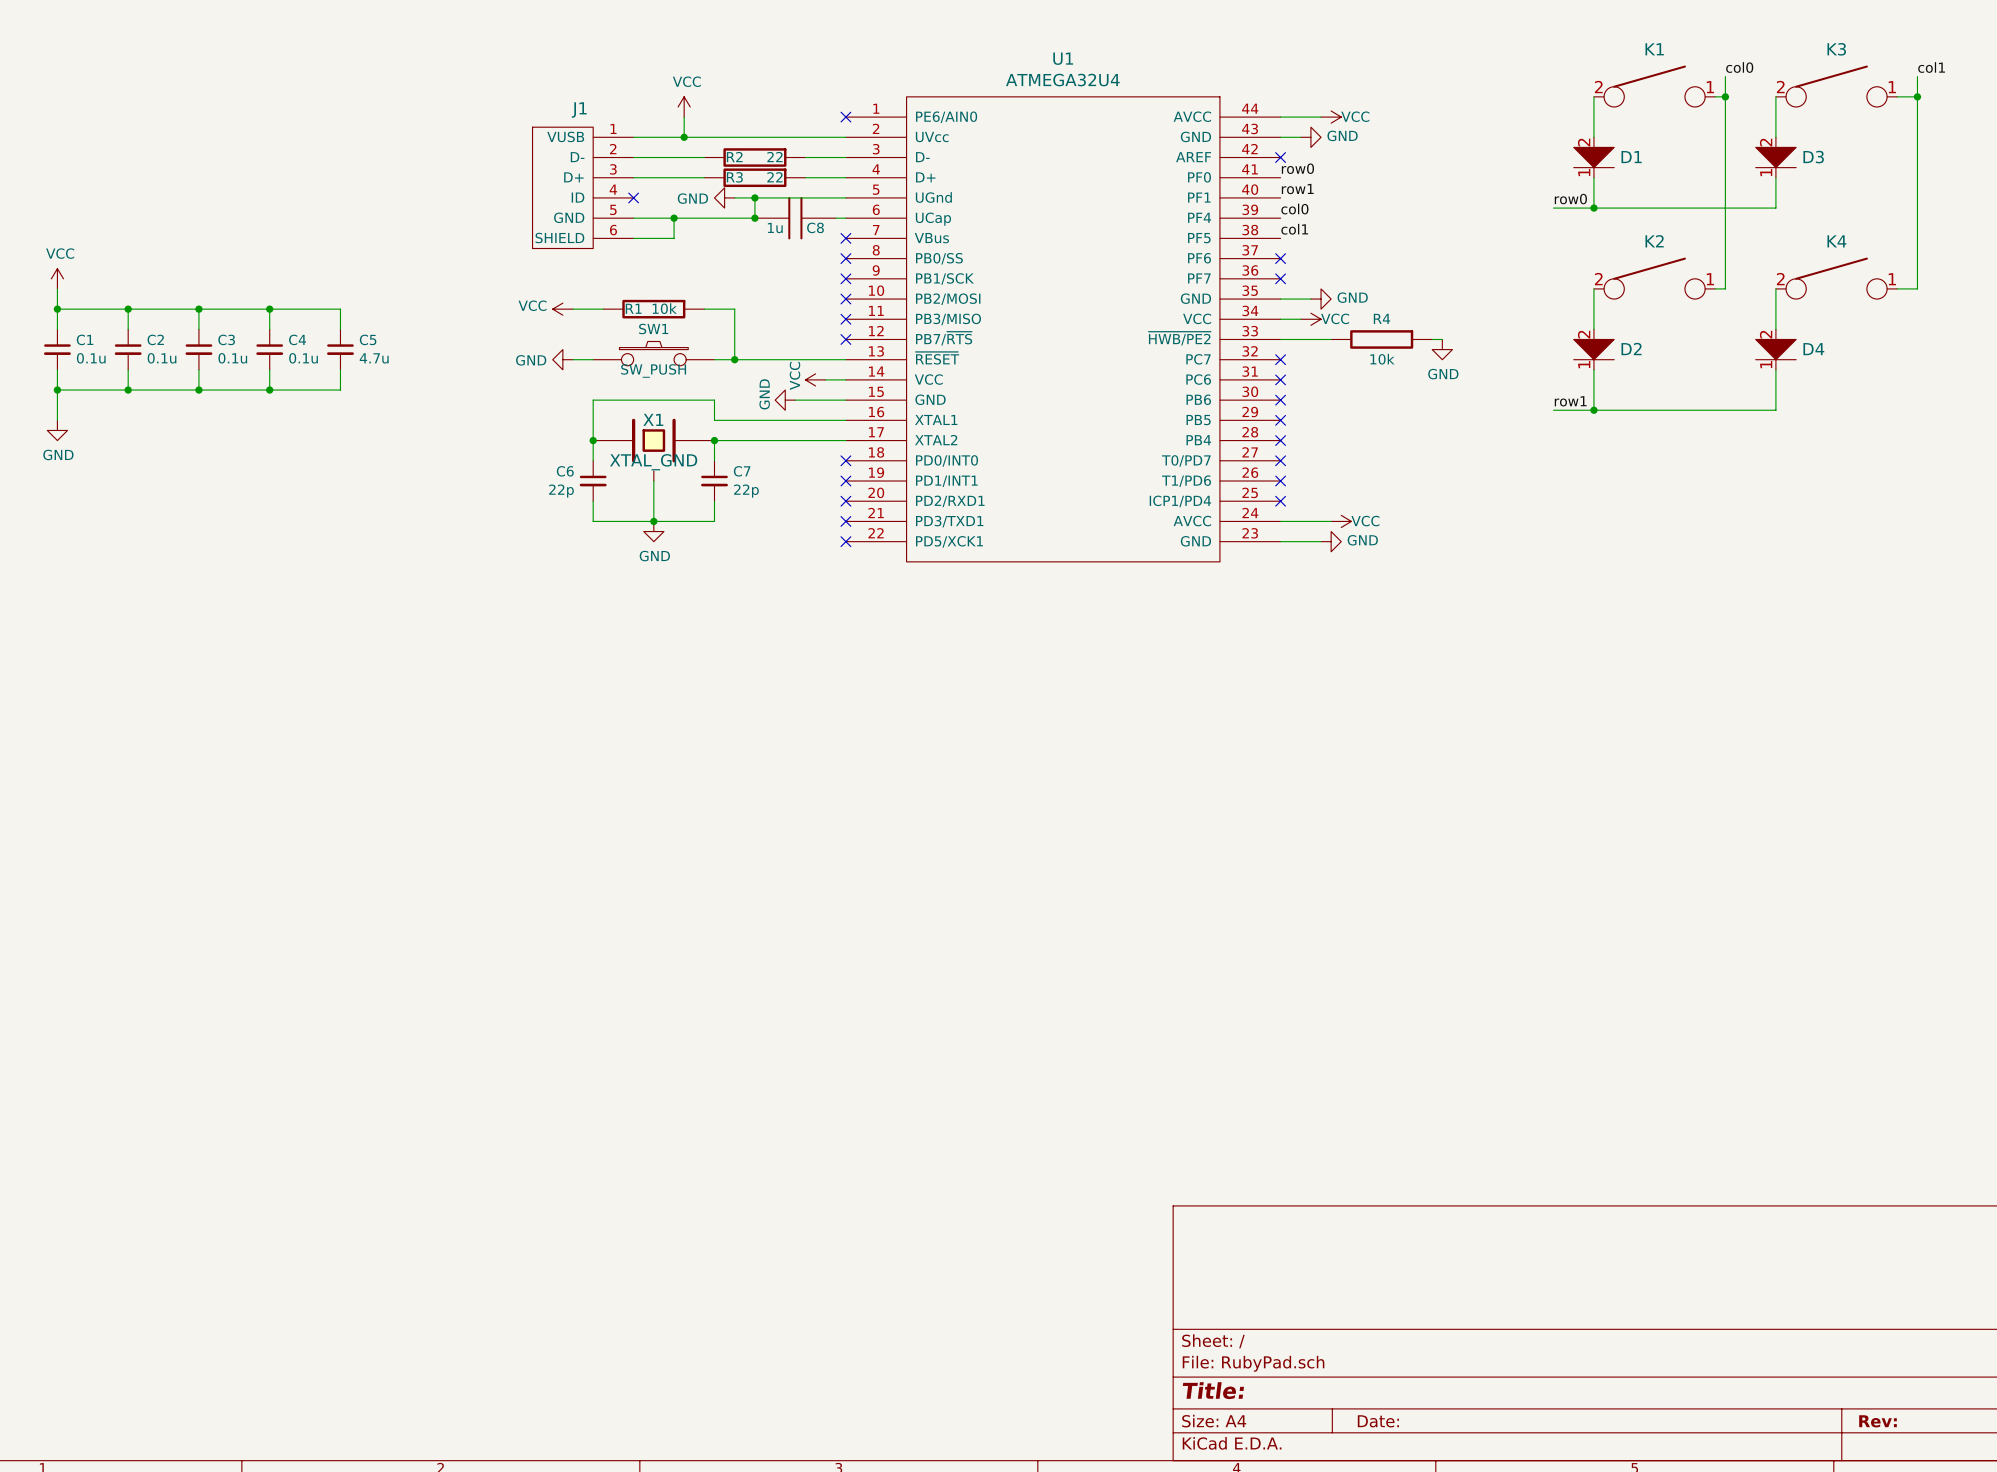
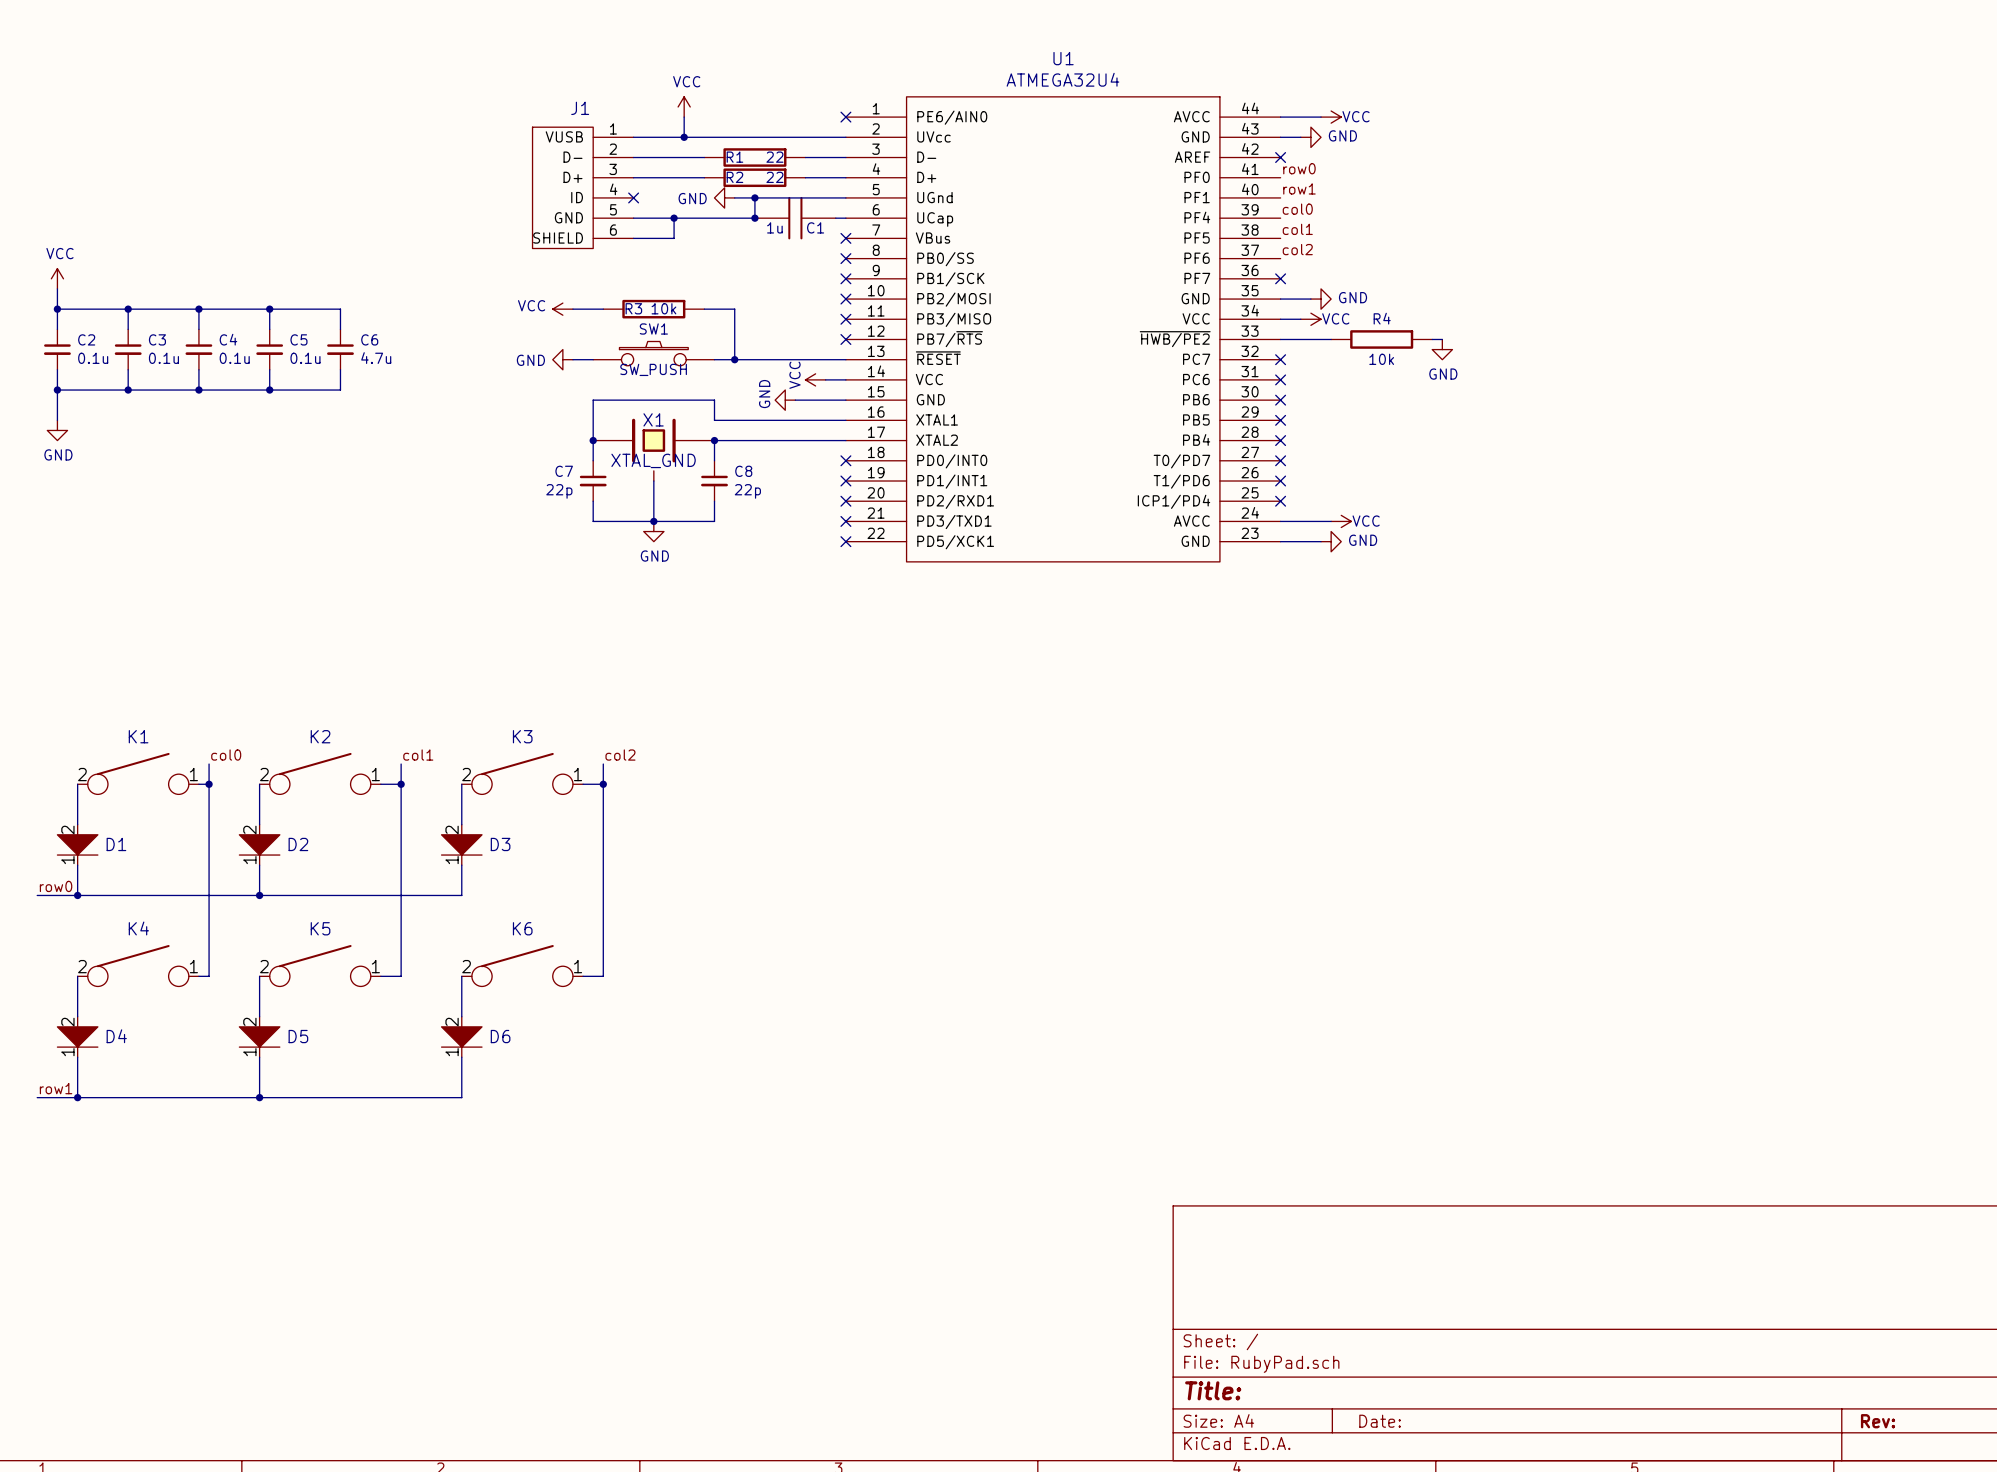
label: col0 (1739, 67) -> none
label: col1 (1931, 67) -> none
wire: (1725, 76) (1725, 288) (1715, 288) -> none
wire: (1917, 76) (1917, 288) (1897, 288) -> none
K1 position: (1654, 86) -> (138, 773)
K3 position: (1836, 86) -> (522, 773)
wire: (1593, 96) (1593, 137) -> none
wire: (1715, 96) (1725, 96) -> none
junction: (1725, 96) -> none
wire: (1775, 96) (1775, 137) -> none
wire: (1897, 96) (1917, 96) -> none
junction: (1917, 96) -> none
R2 name: R2 (734, 157) -> R1 (734, 157)
D1 position: (1593, 157) -> (77, 844)
D3 position: (1775, 157) -> (461, 844)
R3 name: R3 (734, 177) -> R2 (734, 177)
wire: (1593, 177) (1593, 208) -> none
wire: (1775, 177) (1775, 208) (1553, 208) -> none
label: row0 (1570, 199) -> none
junction: (1593, 208) -> none
C8 name: C8 (815, 227) -> C1 (815, 227)
label: none -> col2 (1297, 249)
no-connect mark: (1280, 258) -> none
K2 position: (1654, 278) -> (320, 773)
K4 position: (1836, 278) -> (138, 965)
wire: (1593, 288) (1593, 329) -> none
wire: (1775, 288) (1775, 329) -> none
R1 name: R1 (633, 308) -> R3 (633, 308)
C1 name: C1 (85, 339) -> C2 (86, 339)
C2 name: C2 (155, 339) -> C3 (157, 339)
C3 name: C3 (226, 339) -> C4 (228, 339)
C4 name: C4 (297, 339) -> C5 (298, 339)
C5 name: C5 (368, 339) -> C6 (369, 339)
D2 position: (1593, 349) -> (259, 844)
D4 position: (1775, 349) -> (77, 1036)
wire: (1593, 369) (1593, 410) -> none
wire: (1775, 369) (1775, 410) (1553, 410) -> none
label: row1 (1570, 401) -> none
junction: (1593, 410) -> none
C6 name: C6 (565, 471) -> C7 (564, 471)
C7 name: C7 (742, 471) -> C8 (743, 471)
label: none -> col0 (226, 755)
label: none -> col1 (418, 755)
label: none -> col2 (620, 755)
wire: none -> (209, 764) (209, 976) (198, 976)
wire: none -> (401, 764) (401, 976) (380, 976)
wire: none -> (603, 764) (603, 976) (583, 976)
wire: none -> (77, 784) (77, 824)
wire: none -> (198, 784) (209, 784)
junction: none -> (209, 784)
wire: none -> (259, 784) (259, 824)
wire: none -> (380, 784) (401, 784)
junction: none -> (401, 784)
wire: none -> (461, 784) (461, 824)
wire: none -> (583, 784) (603, 784)
junction: none -> (603, 784)
wire: none -> (77, 865) (77, 895)
wire: none -> (259, 865) (259, 895)
wire: none -> (461, 865) (461, 895) (37, 895)
label: none -> row0 (56, 886)
junction: none -> (77, 895)
junction: none -> (259, 895)
K5: none -> (320, 965)
K6: none -> (522, 965)
wire: none -> (77, 976) (77, 1016)
wire: none -> (259, 976) (259, 1016)
wire: none -> (461, 976) (461, 1016)
D5: none -> (259, 1036)
D6: none -> (461, 1036)
wire: none -> (77, 1057) (77, 1097)
wire: none -> (259, 1057) (259, 1097)
wire: none -> (461, 1057) (461, 1097) (37, 1097)
label: none -> row1 (56, 1088)
junction: none -> (77, 1097)
junction: none -> (259, 1097)

